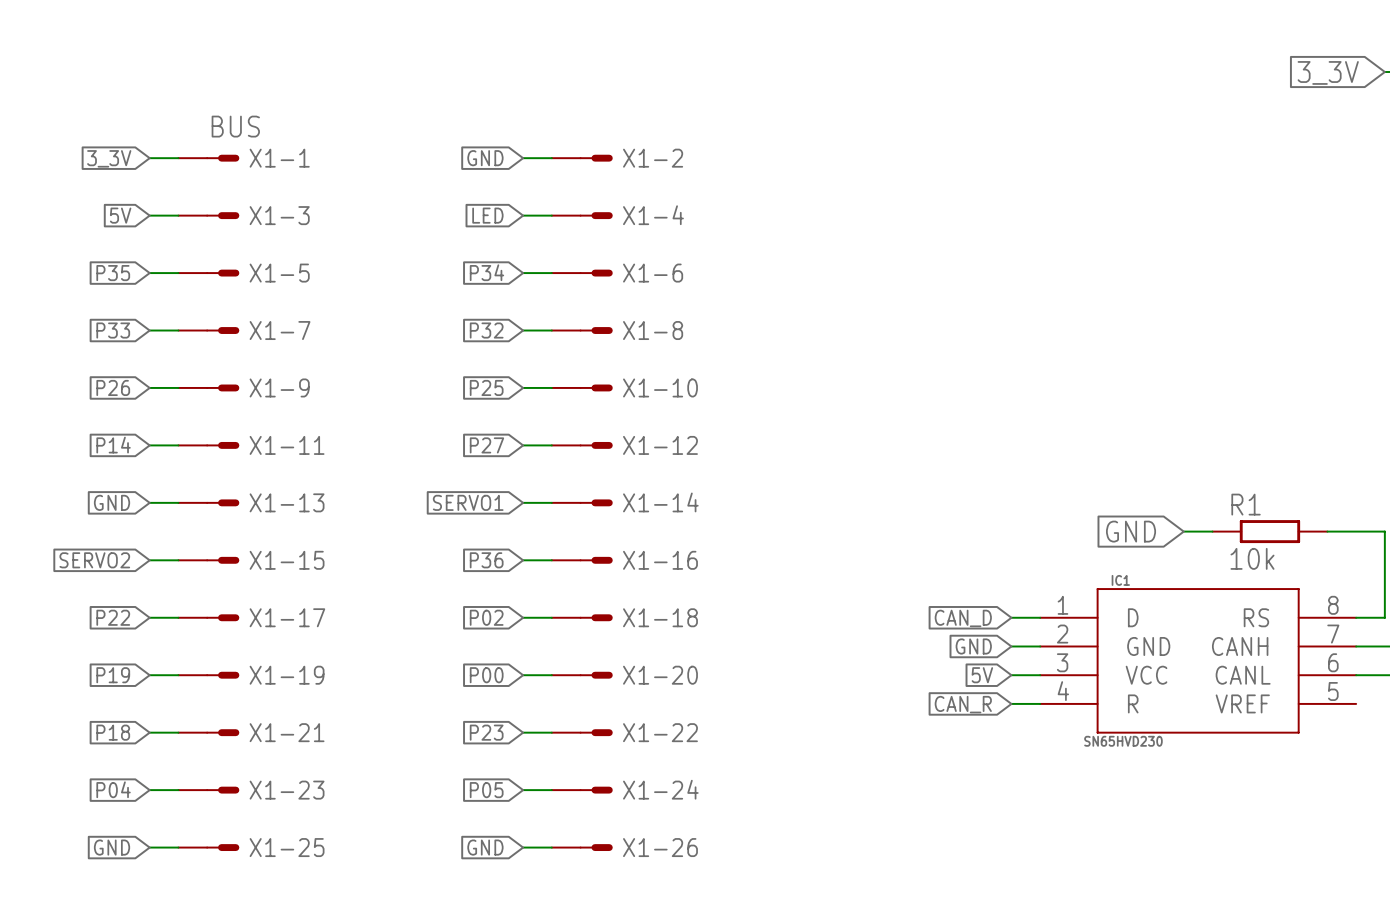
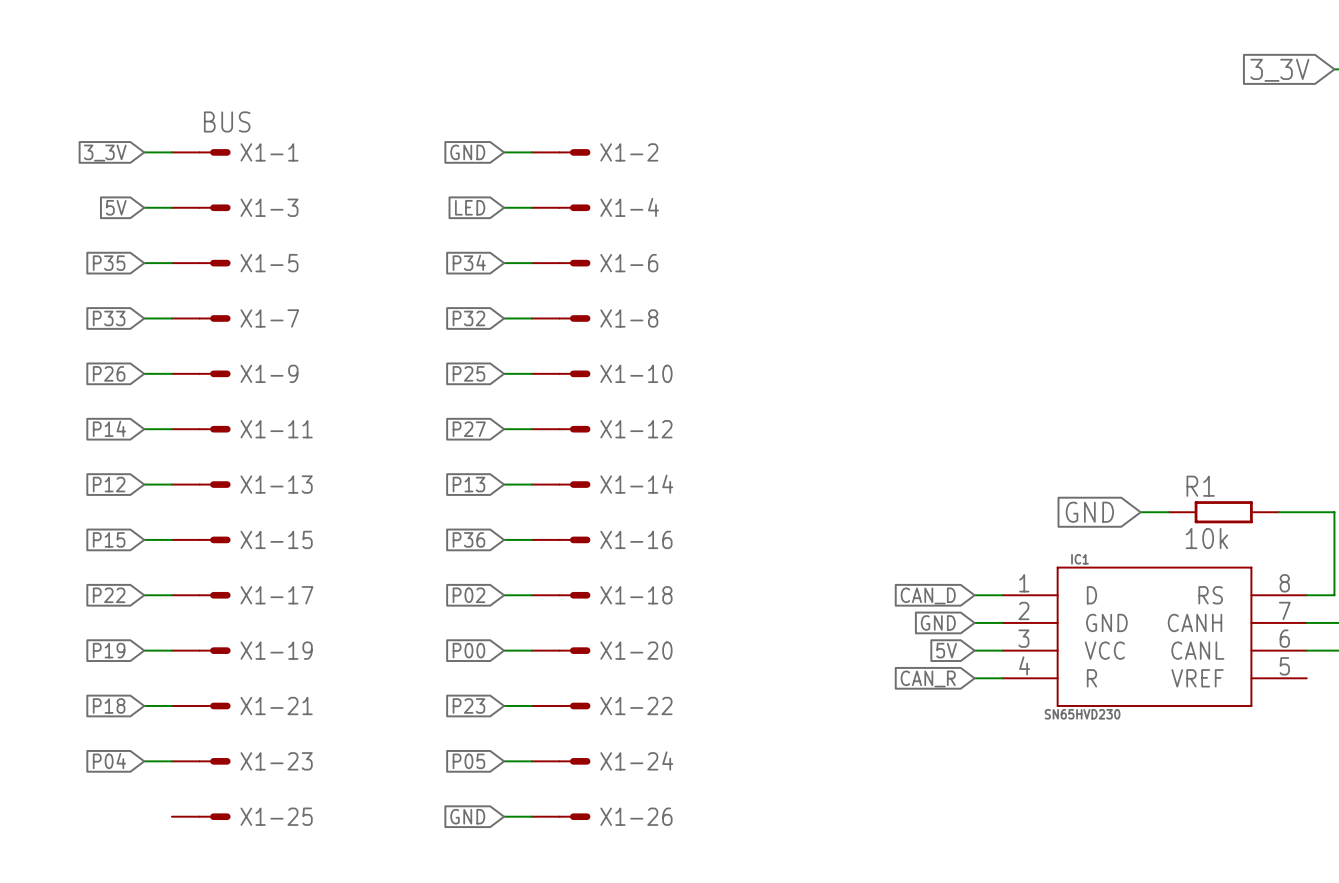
global label: GND (112, 502) -> P12 (109, 484)
global label: SERVO1 (468, 502) -> P13 (468, 484)
global label: SERVO2 (94, 560) -> P15 (109, 539)
global label: GND (112, 847) -> none
wire: (149, 847) (178, 847) -> none

